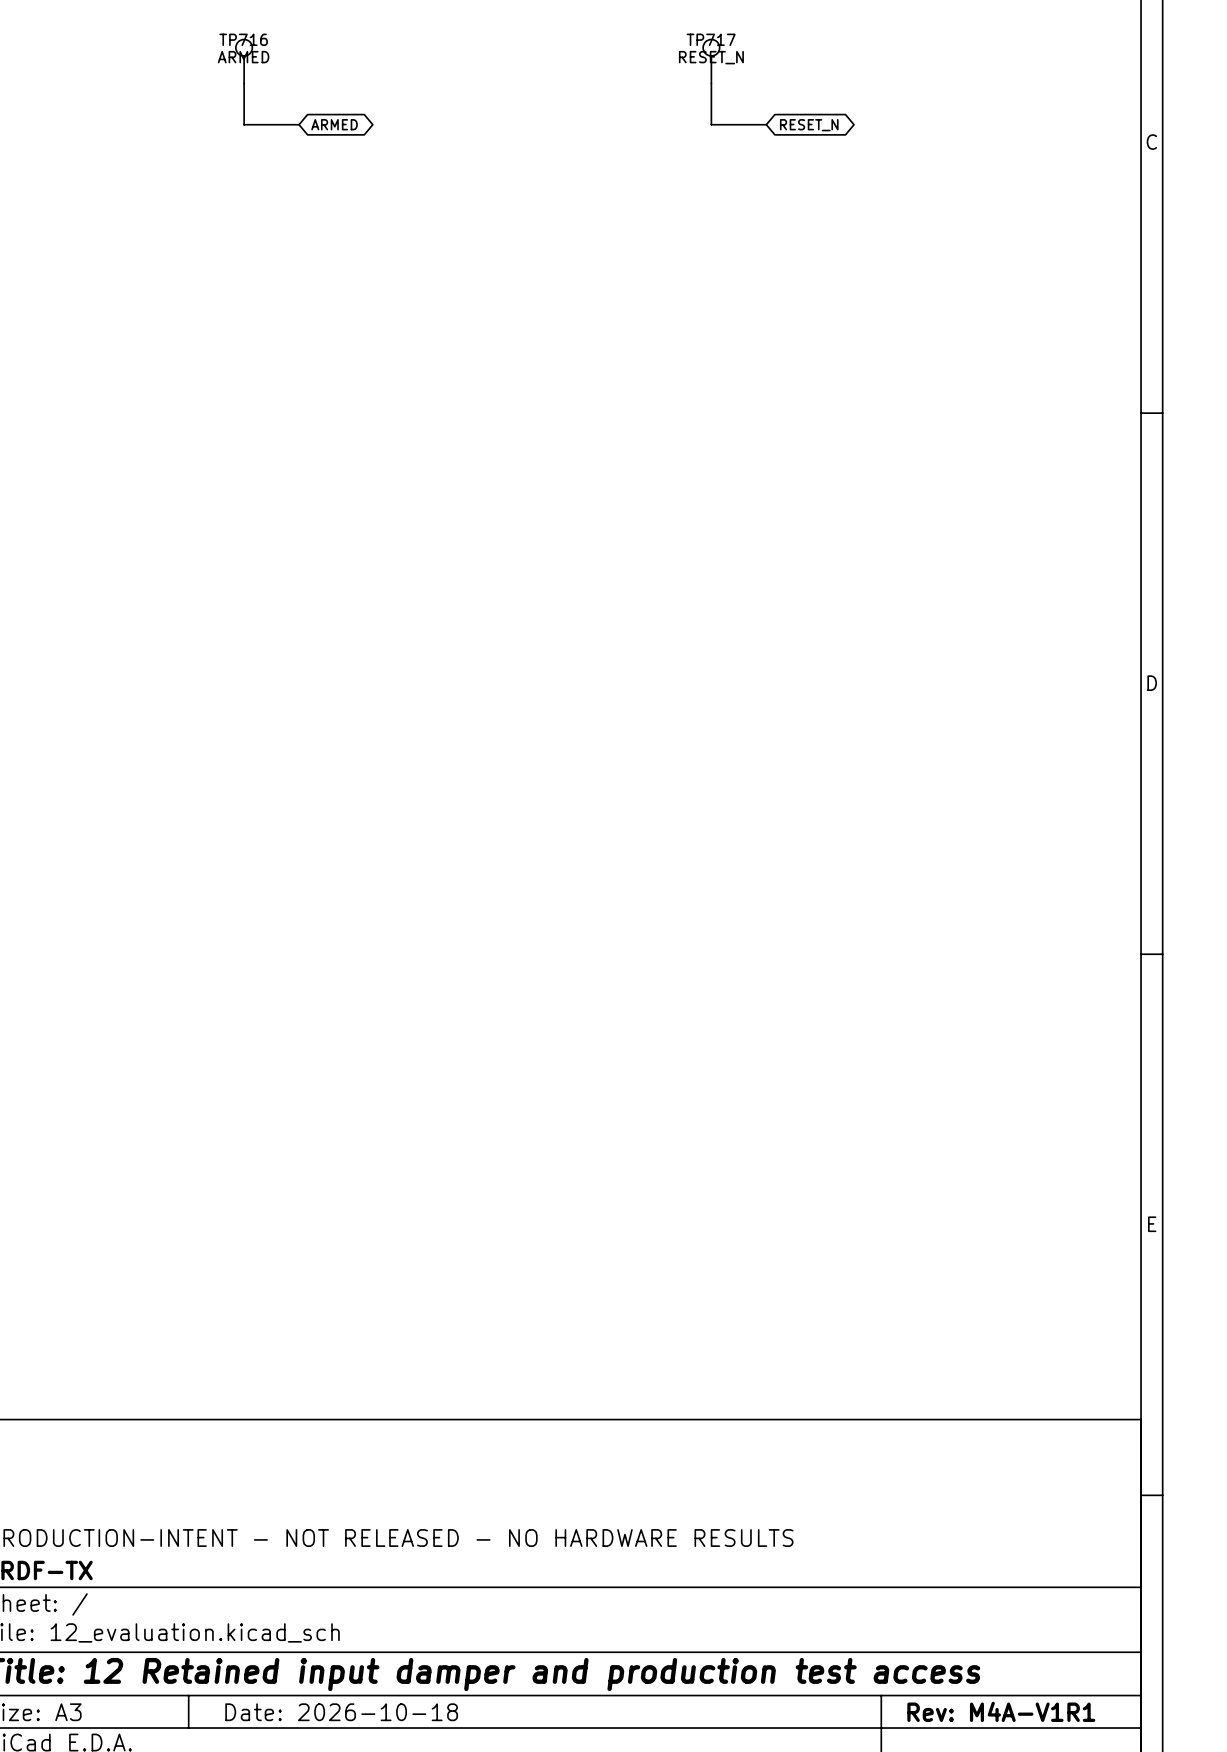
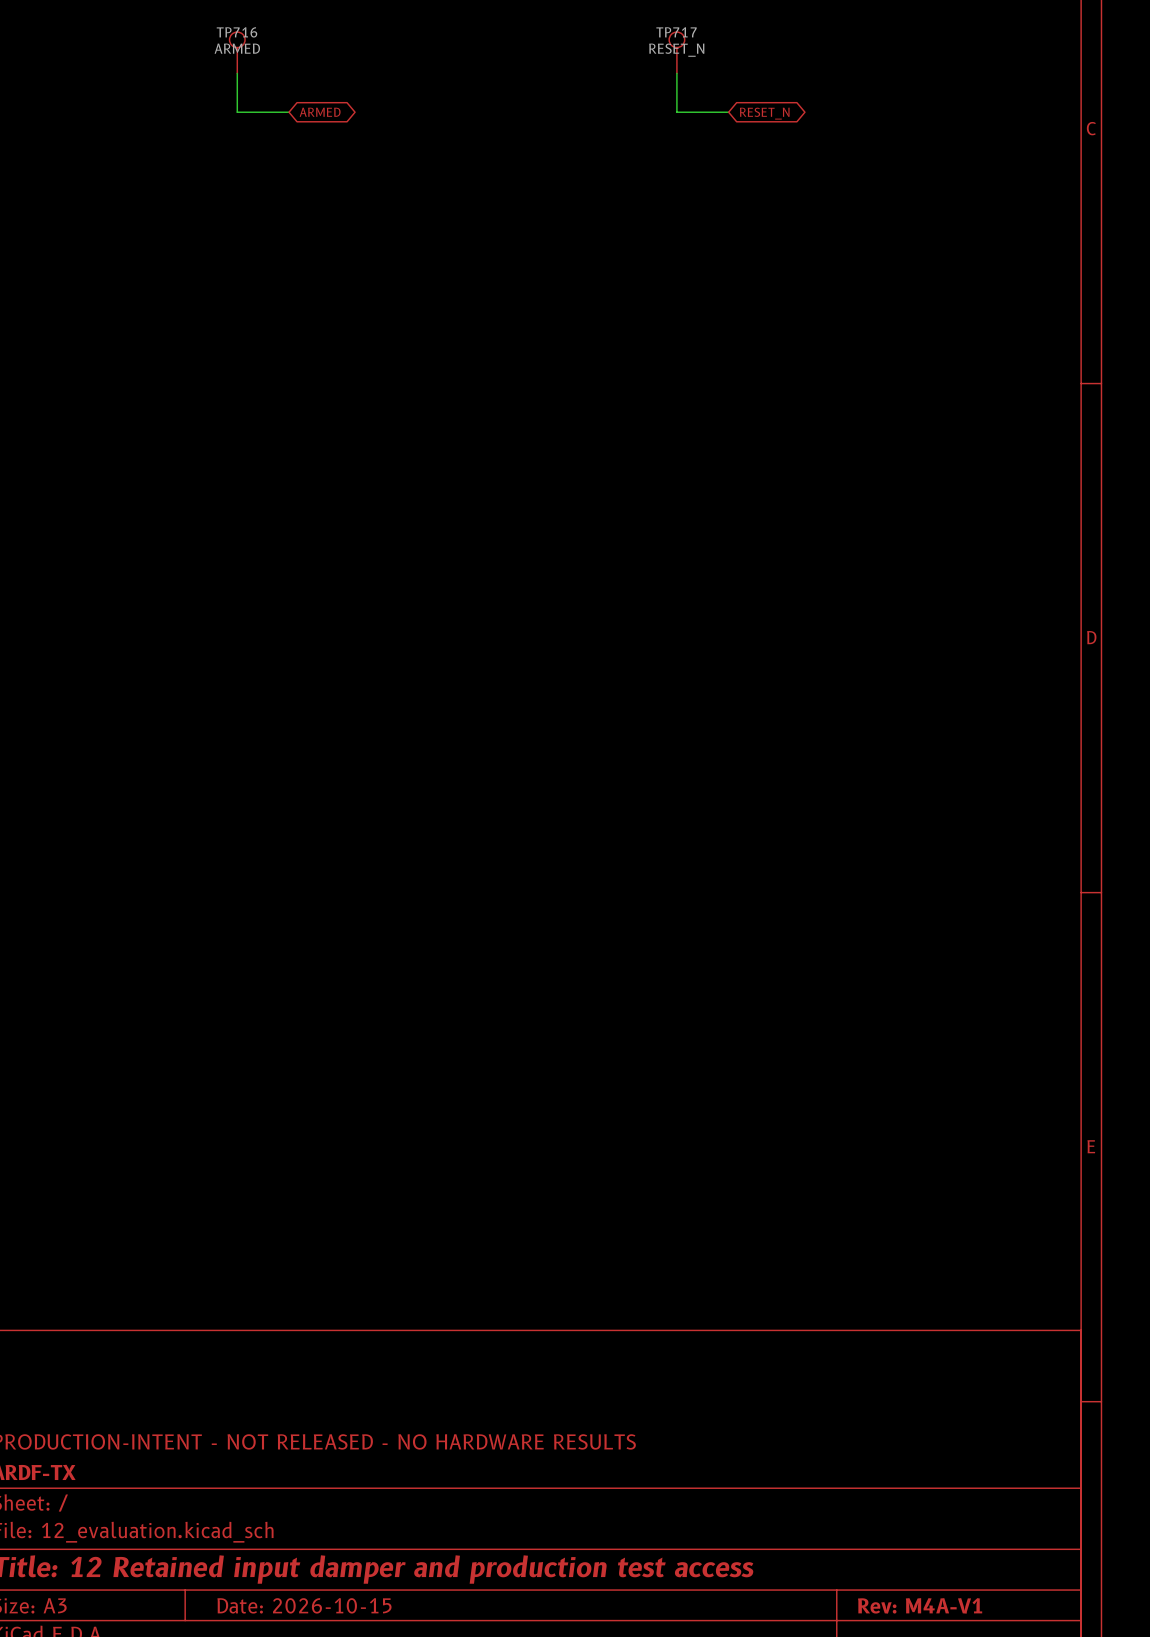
title block: Rev: M4A-V1R1 (1001, 1711) -> Rev: M4A-V1 (920, 1605)
title block: Date: 2026-10-18 (341, 1712) -> Date: 2026-10-15 (304, 1605)

